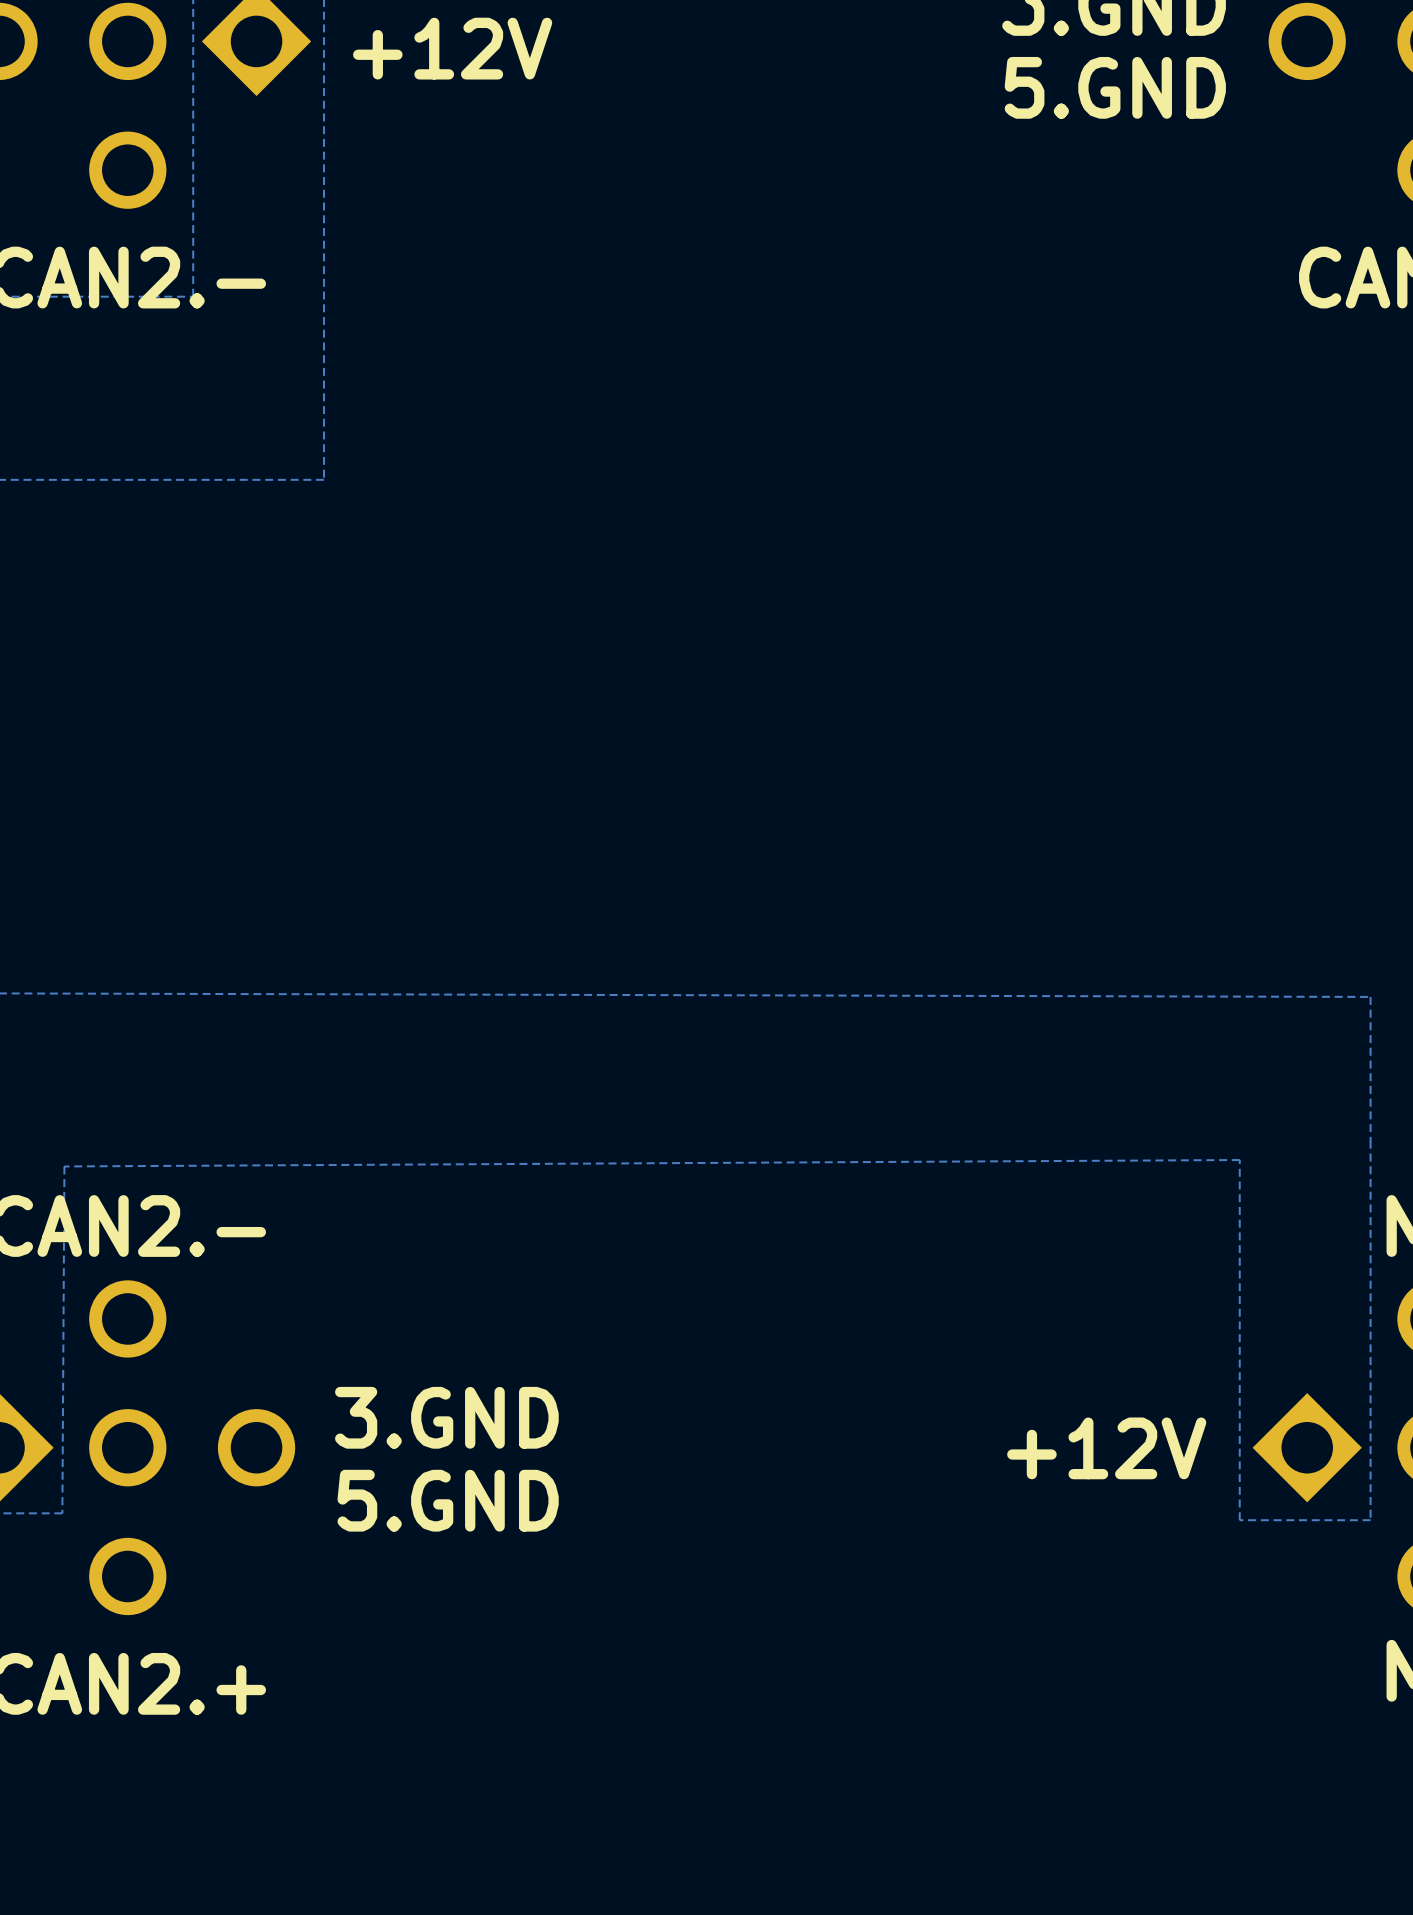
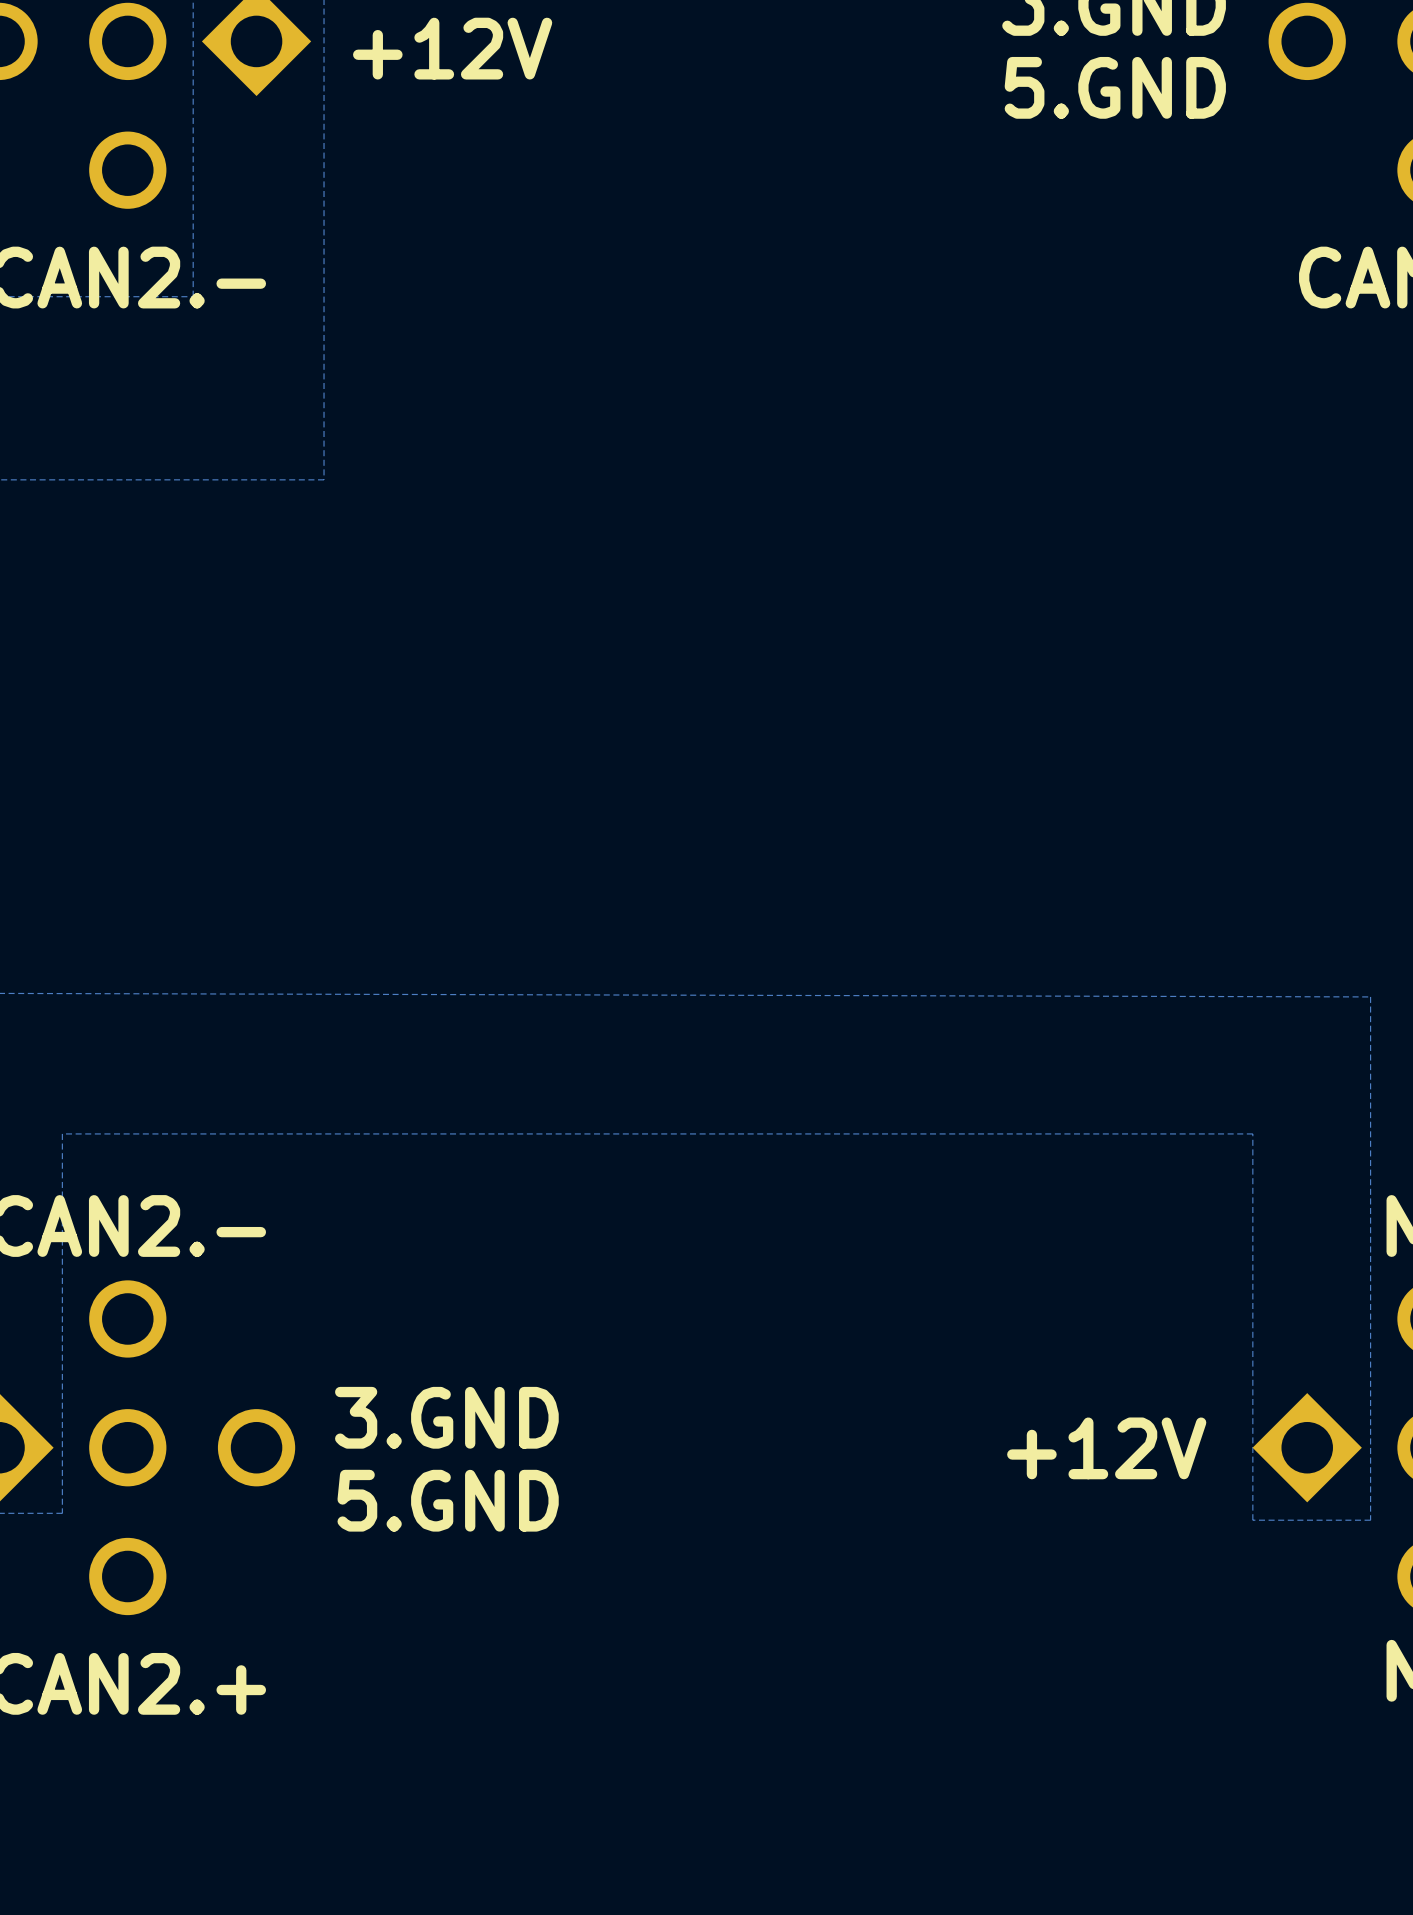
zone outline: (62, 1513) (64, 1166) (1239, 1160) (1239, 1520) (1252, 1520) -> (62, 1513) (62, 1133) (1252, 1133) (1252, 1520)

